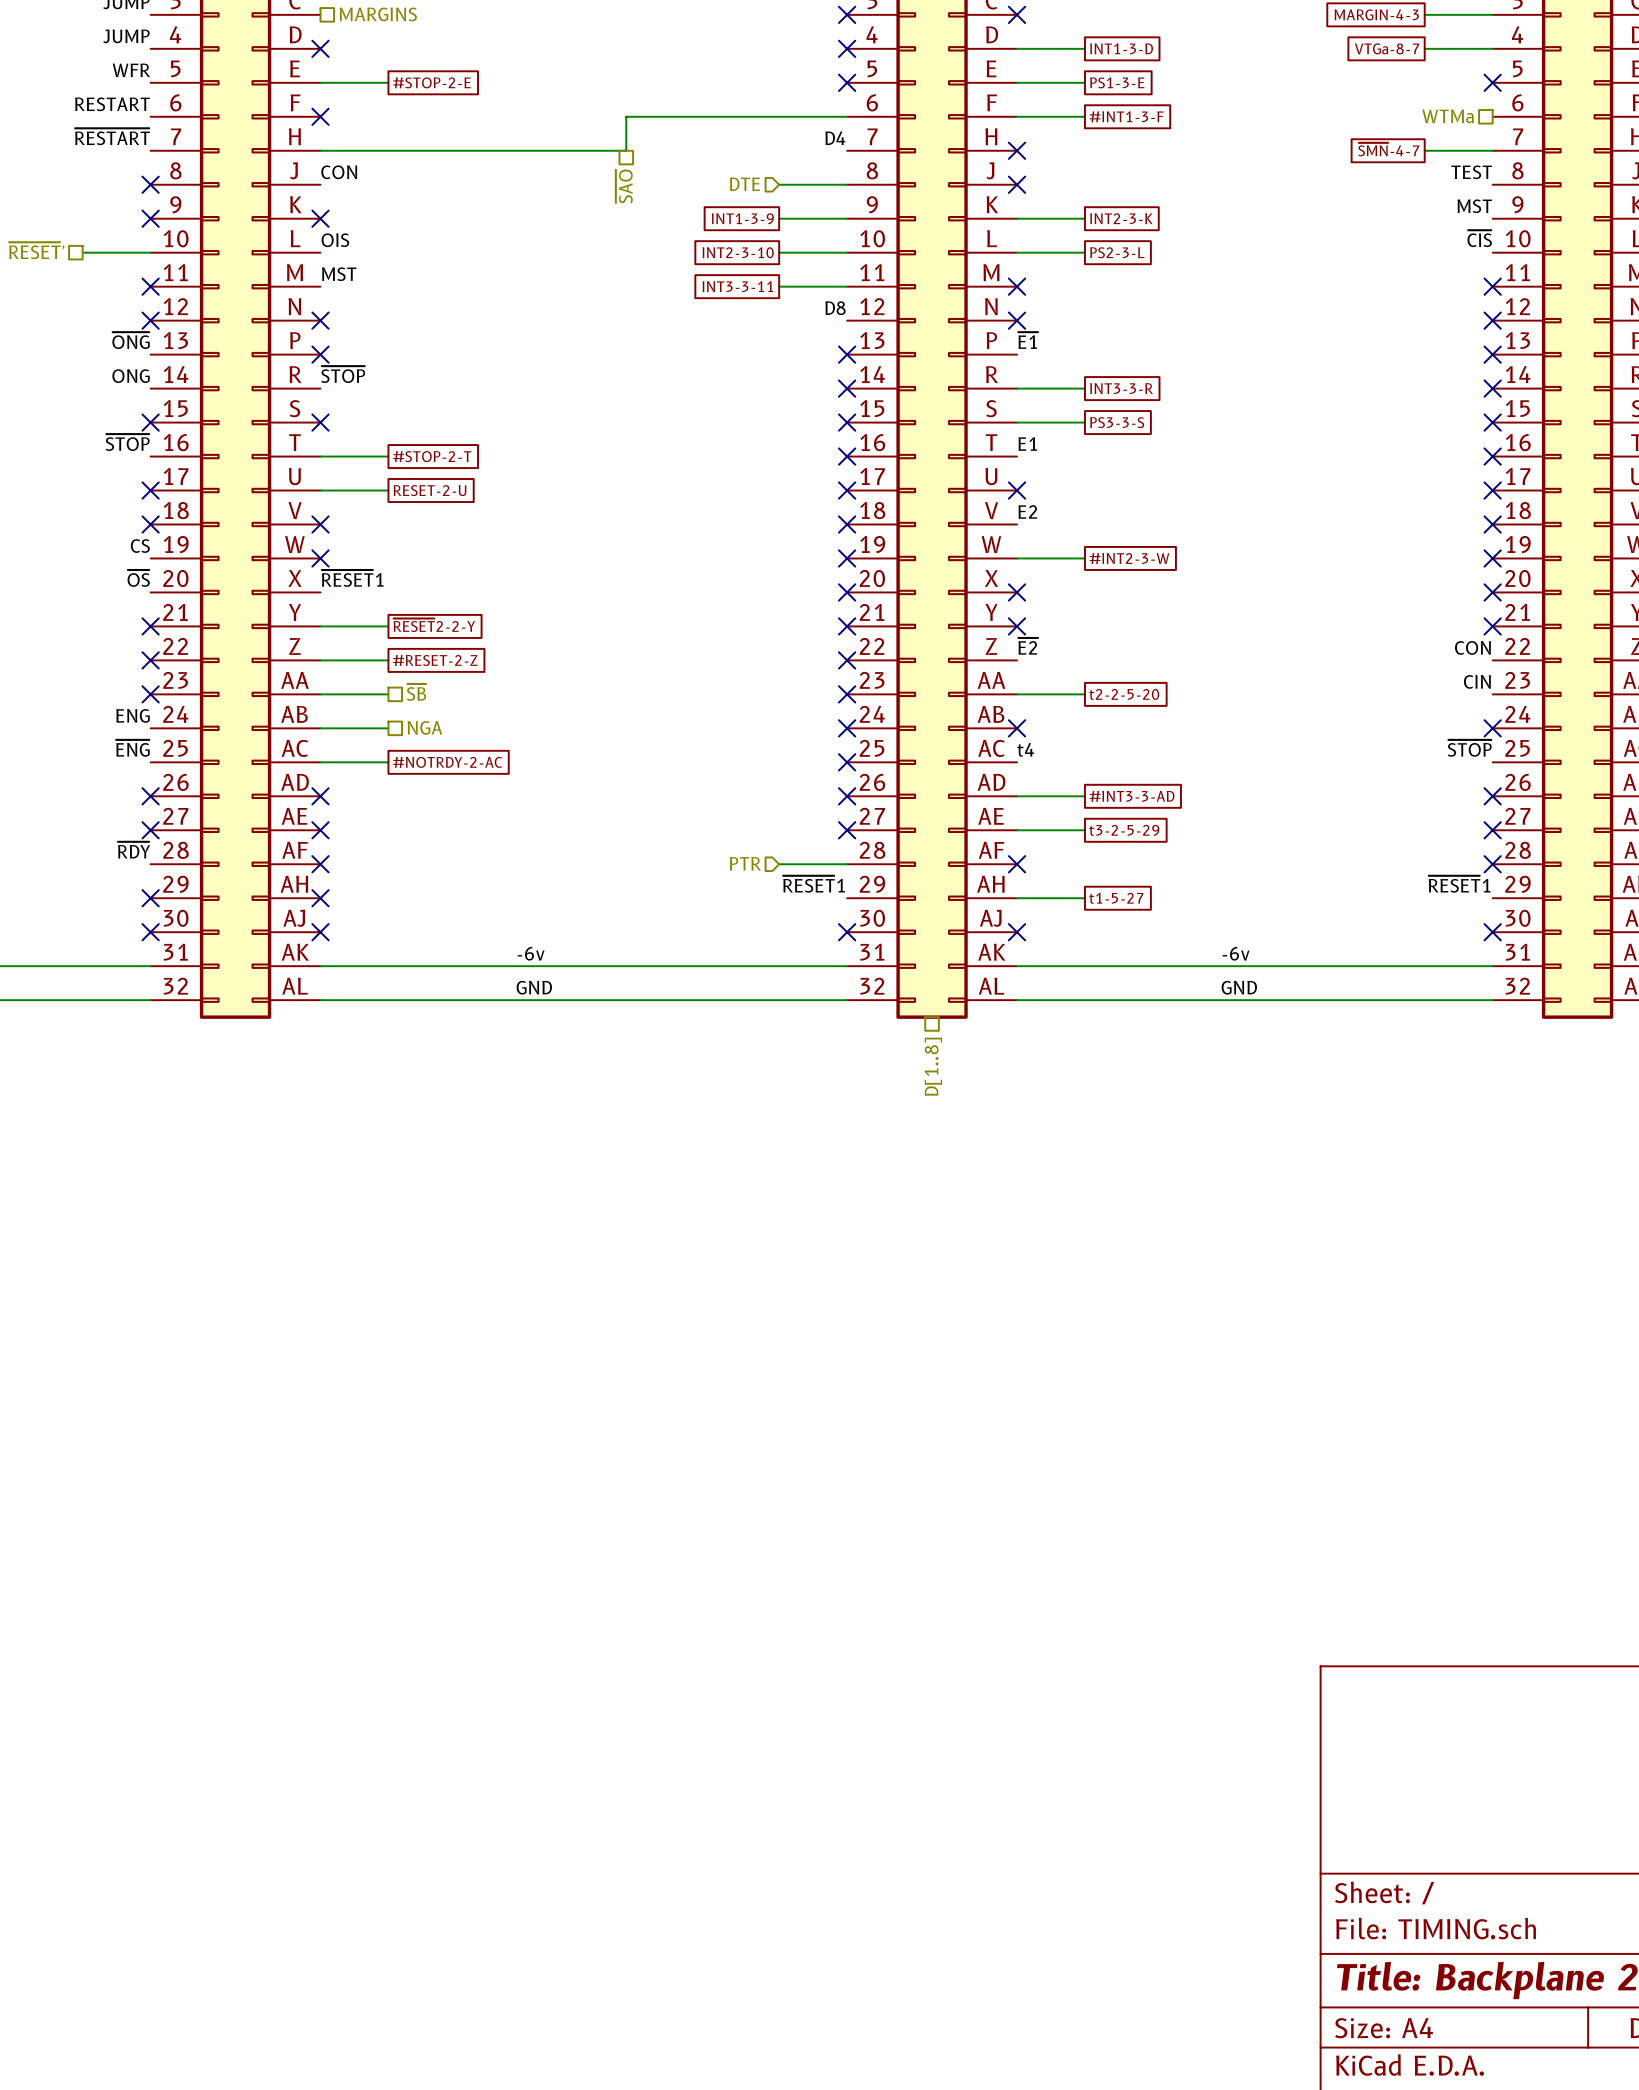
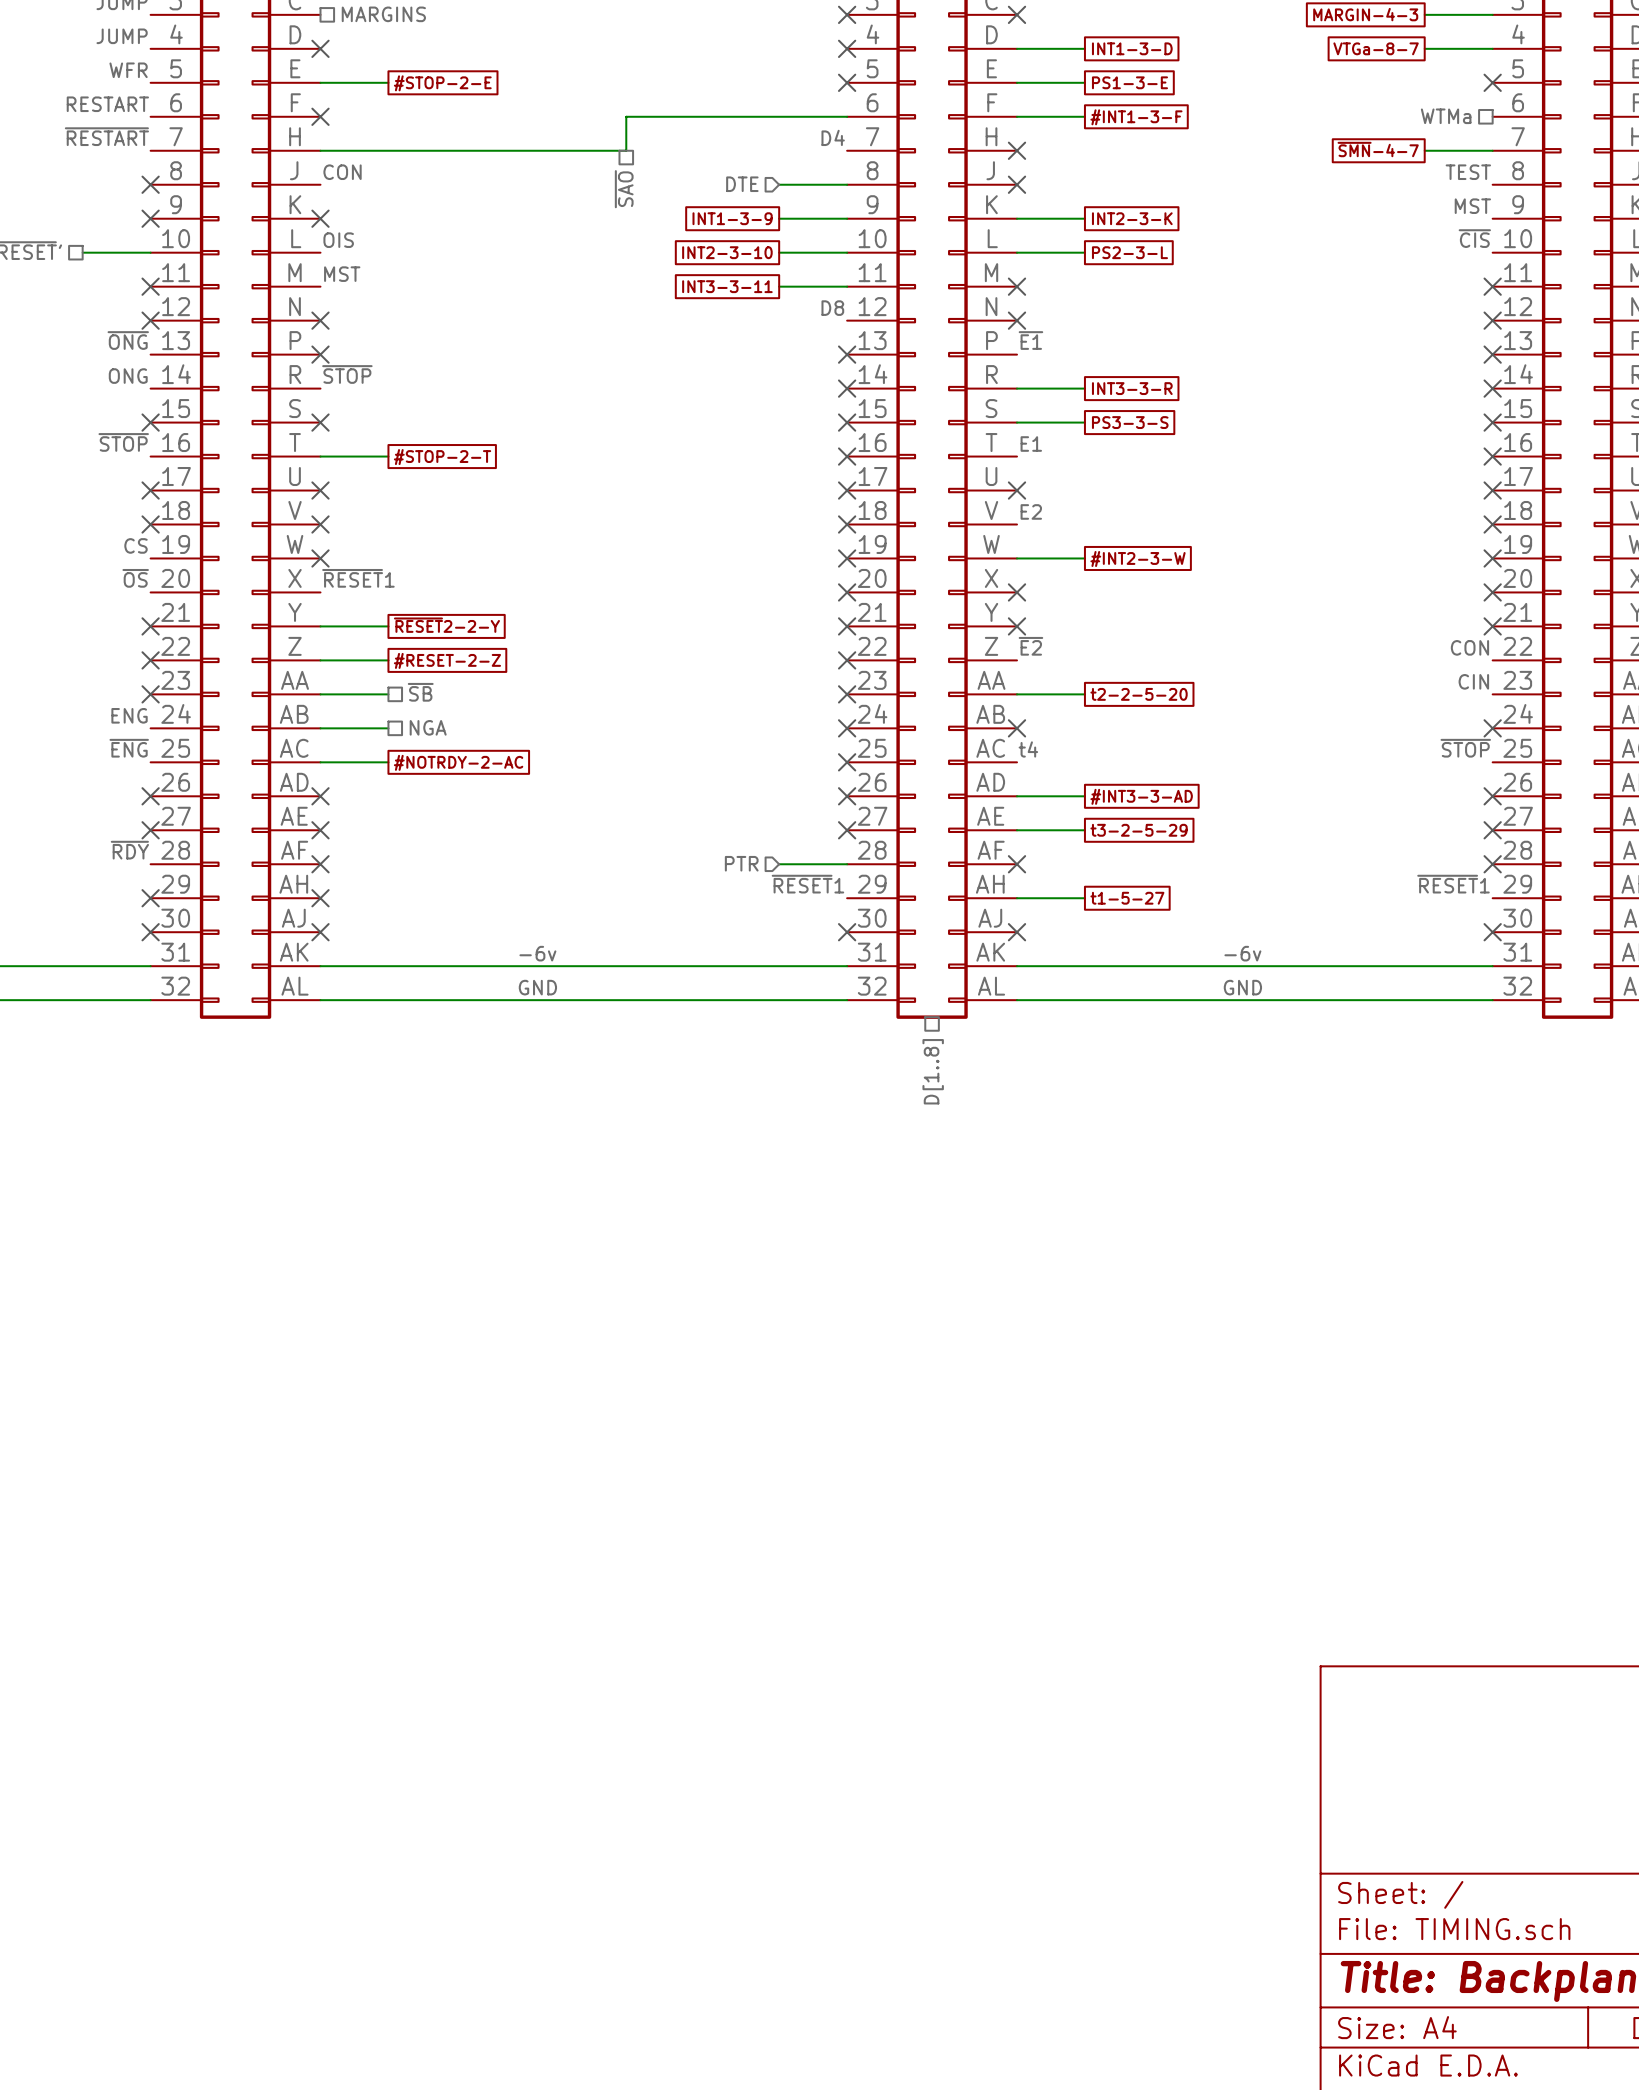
wire: (320, 490) (388, 490) -> none
no-connect mark: none -> (320, 490)
global label: RESET-2-U (429, 490) -> none

